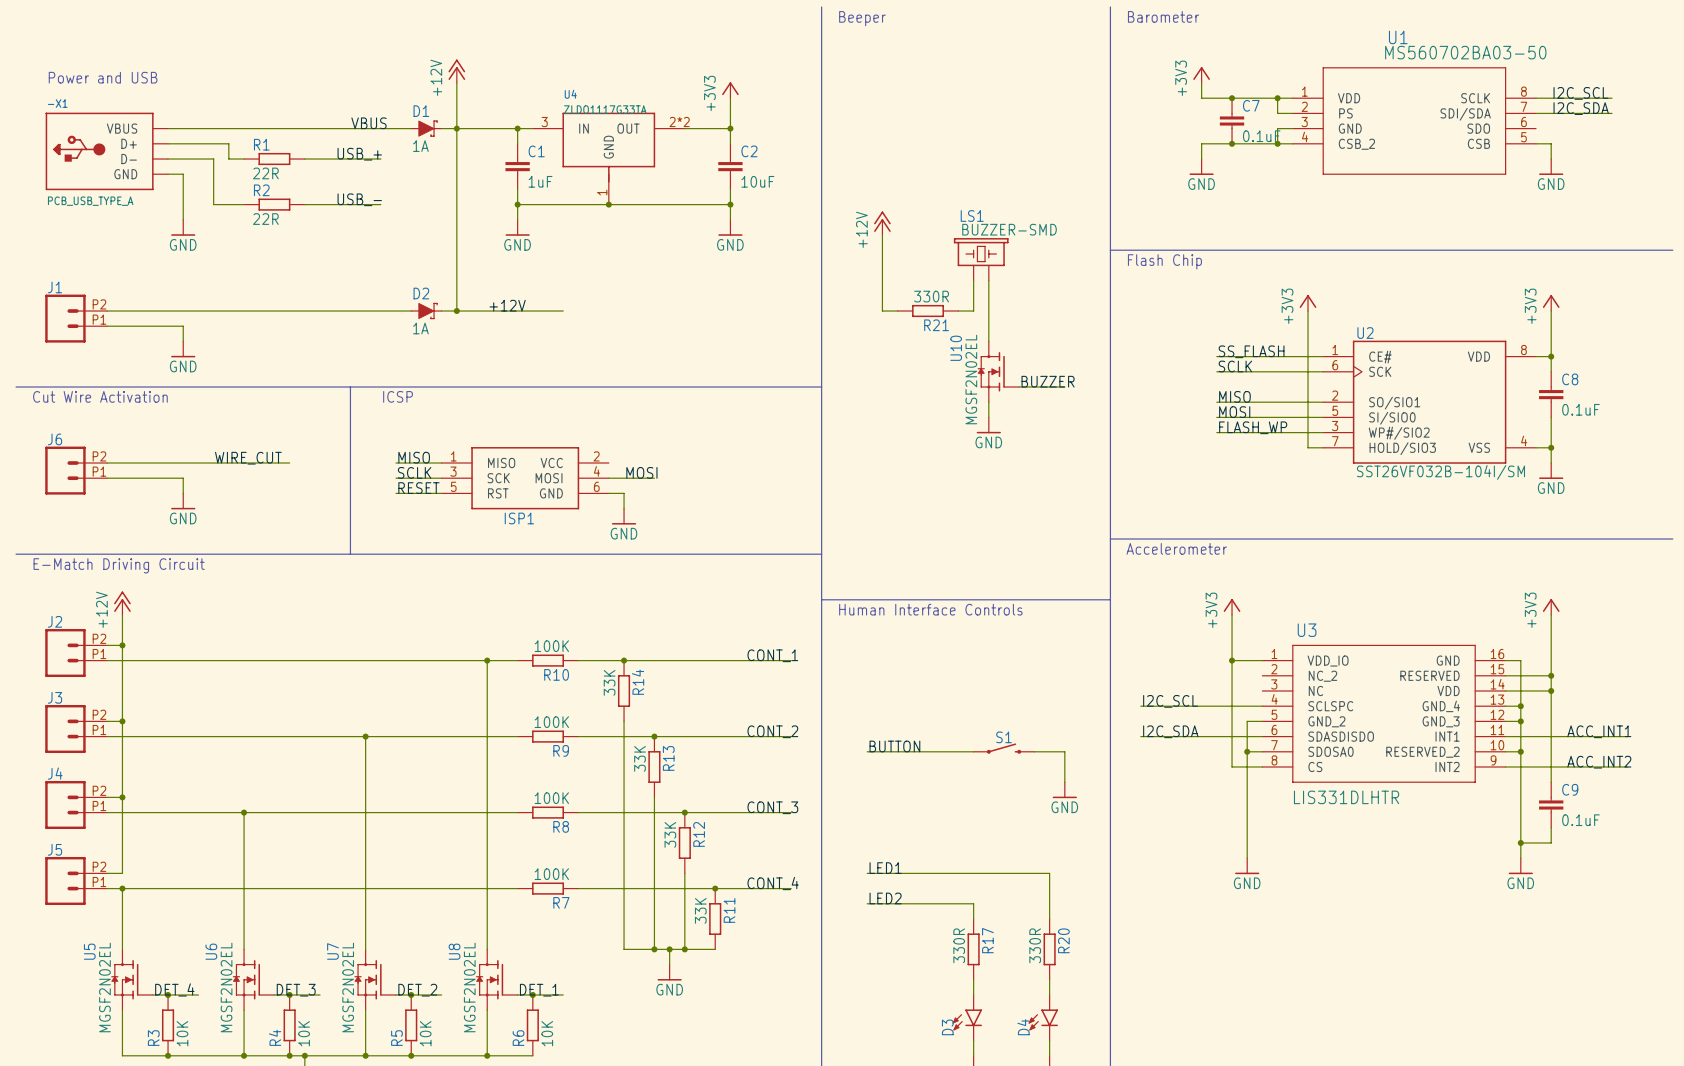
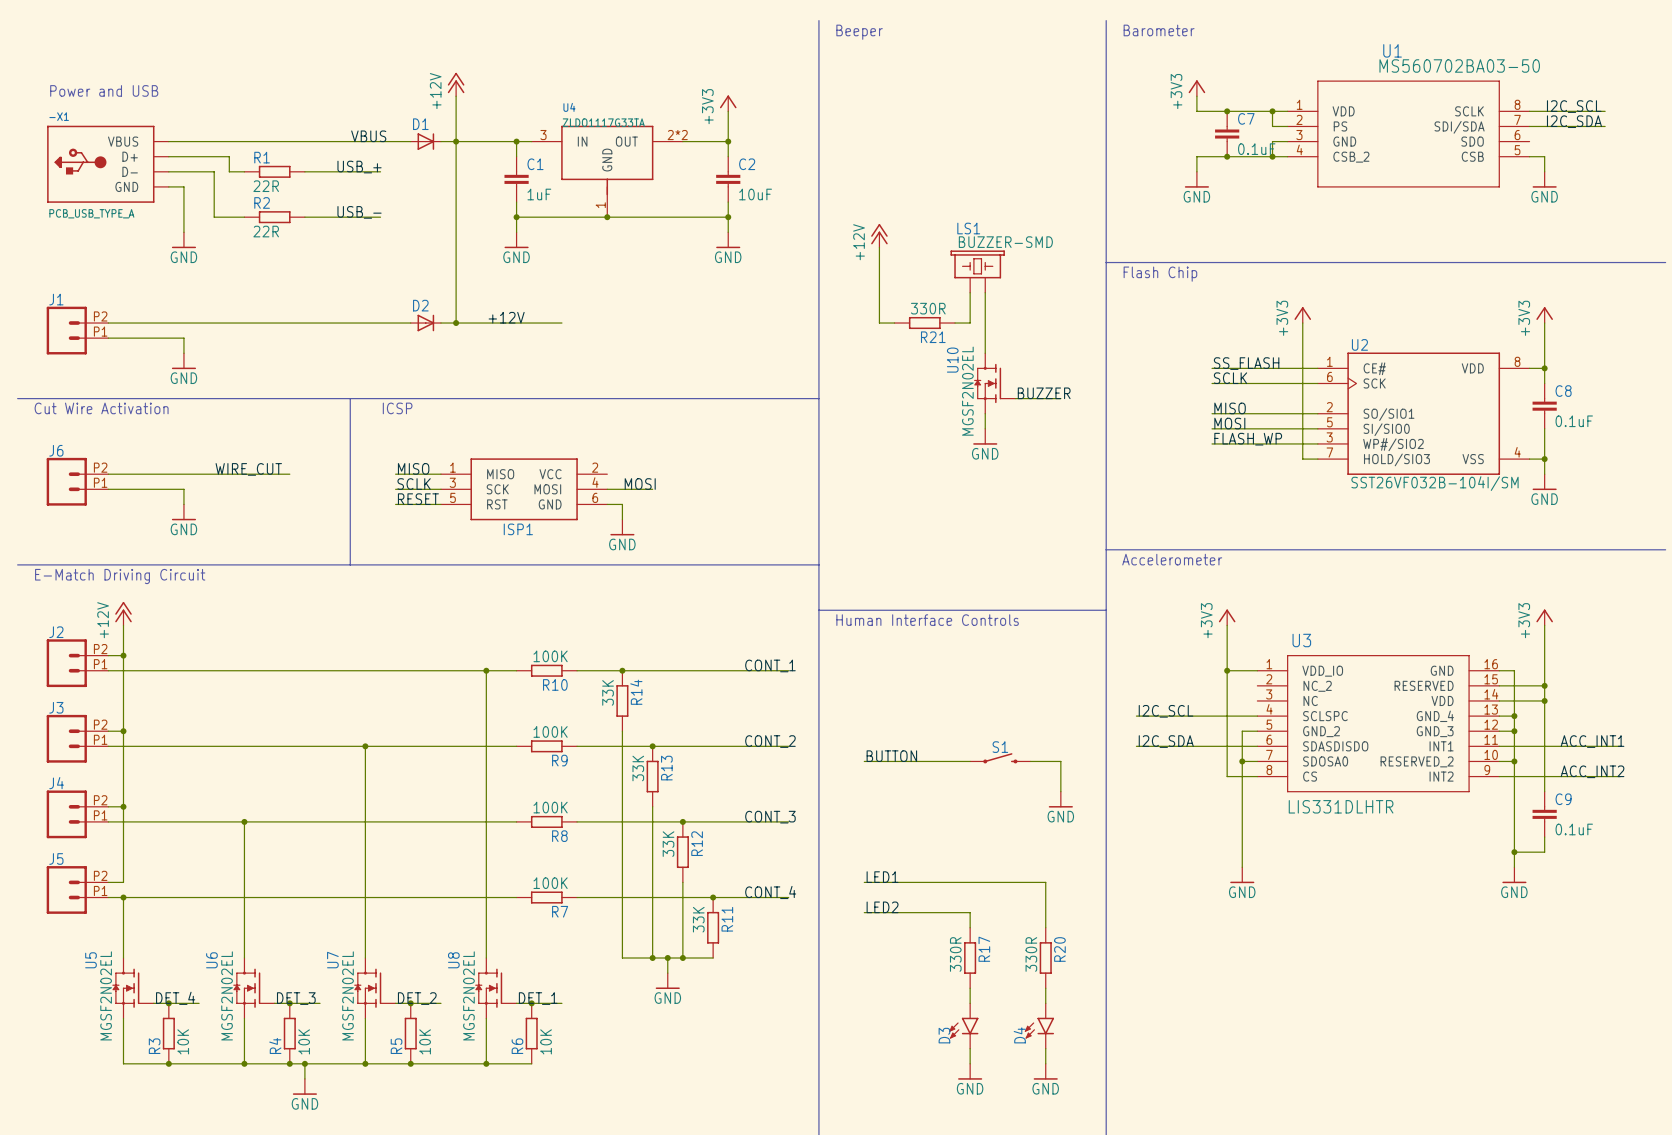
D1 symbol: [410, 120, 443, 137] -> [410, 133, 441, 150]
D1 value: 1A (420, 146) -> none
D2 symbol: [410, 302, 443, 320] -> [410, 314, 441, 332]
D2 value: 1A (420, 328) -> none

